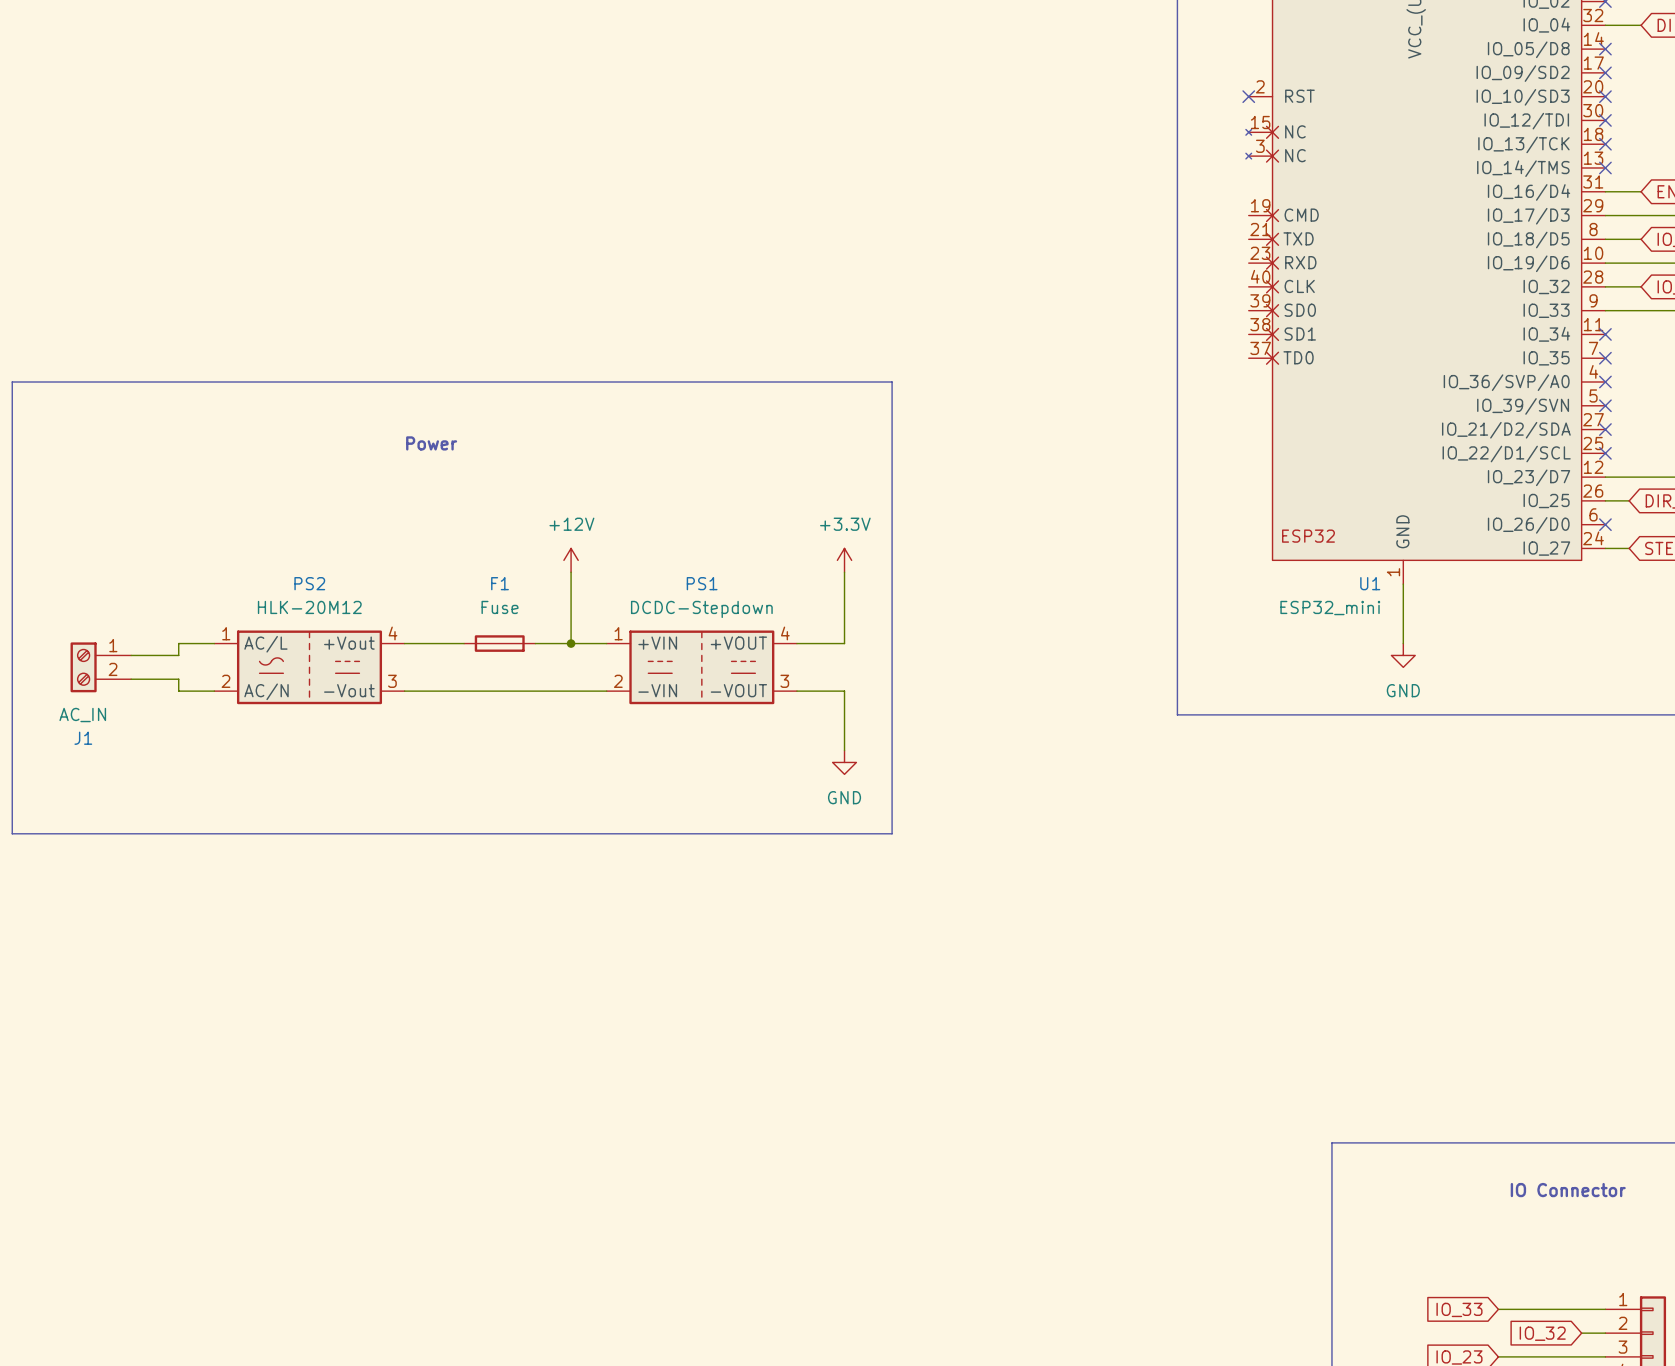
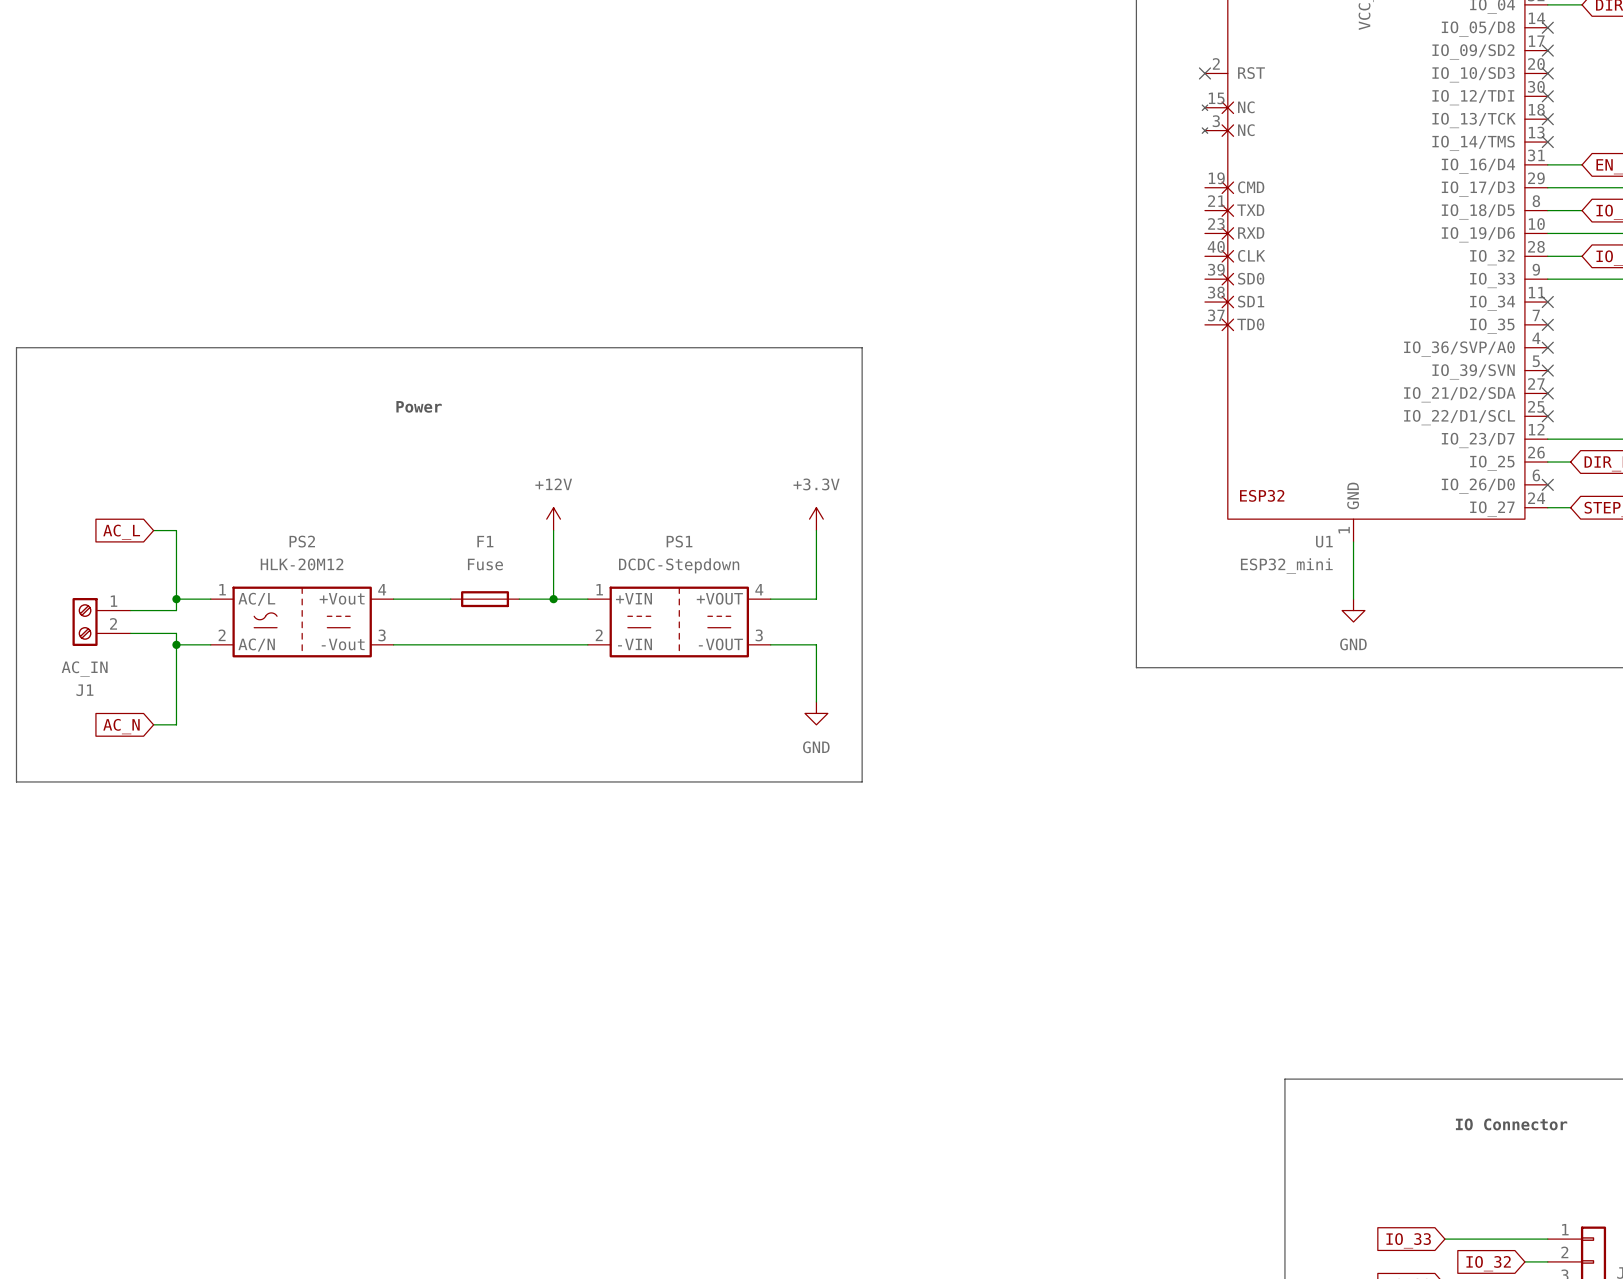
global label: none -> AC_L (121, 532)
wire: none -> (153, 530) (176, 530) (176, 599)
junction: none -> (176, 599)
wire: none -> (176, 644) (176, 724) (153, 724)
junction: none -> (176, 644)
global label: none -> AC_N (121, 726)

